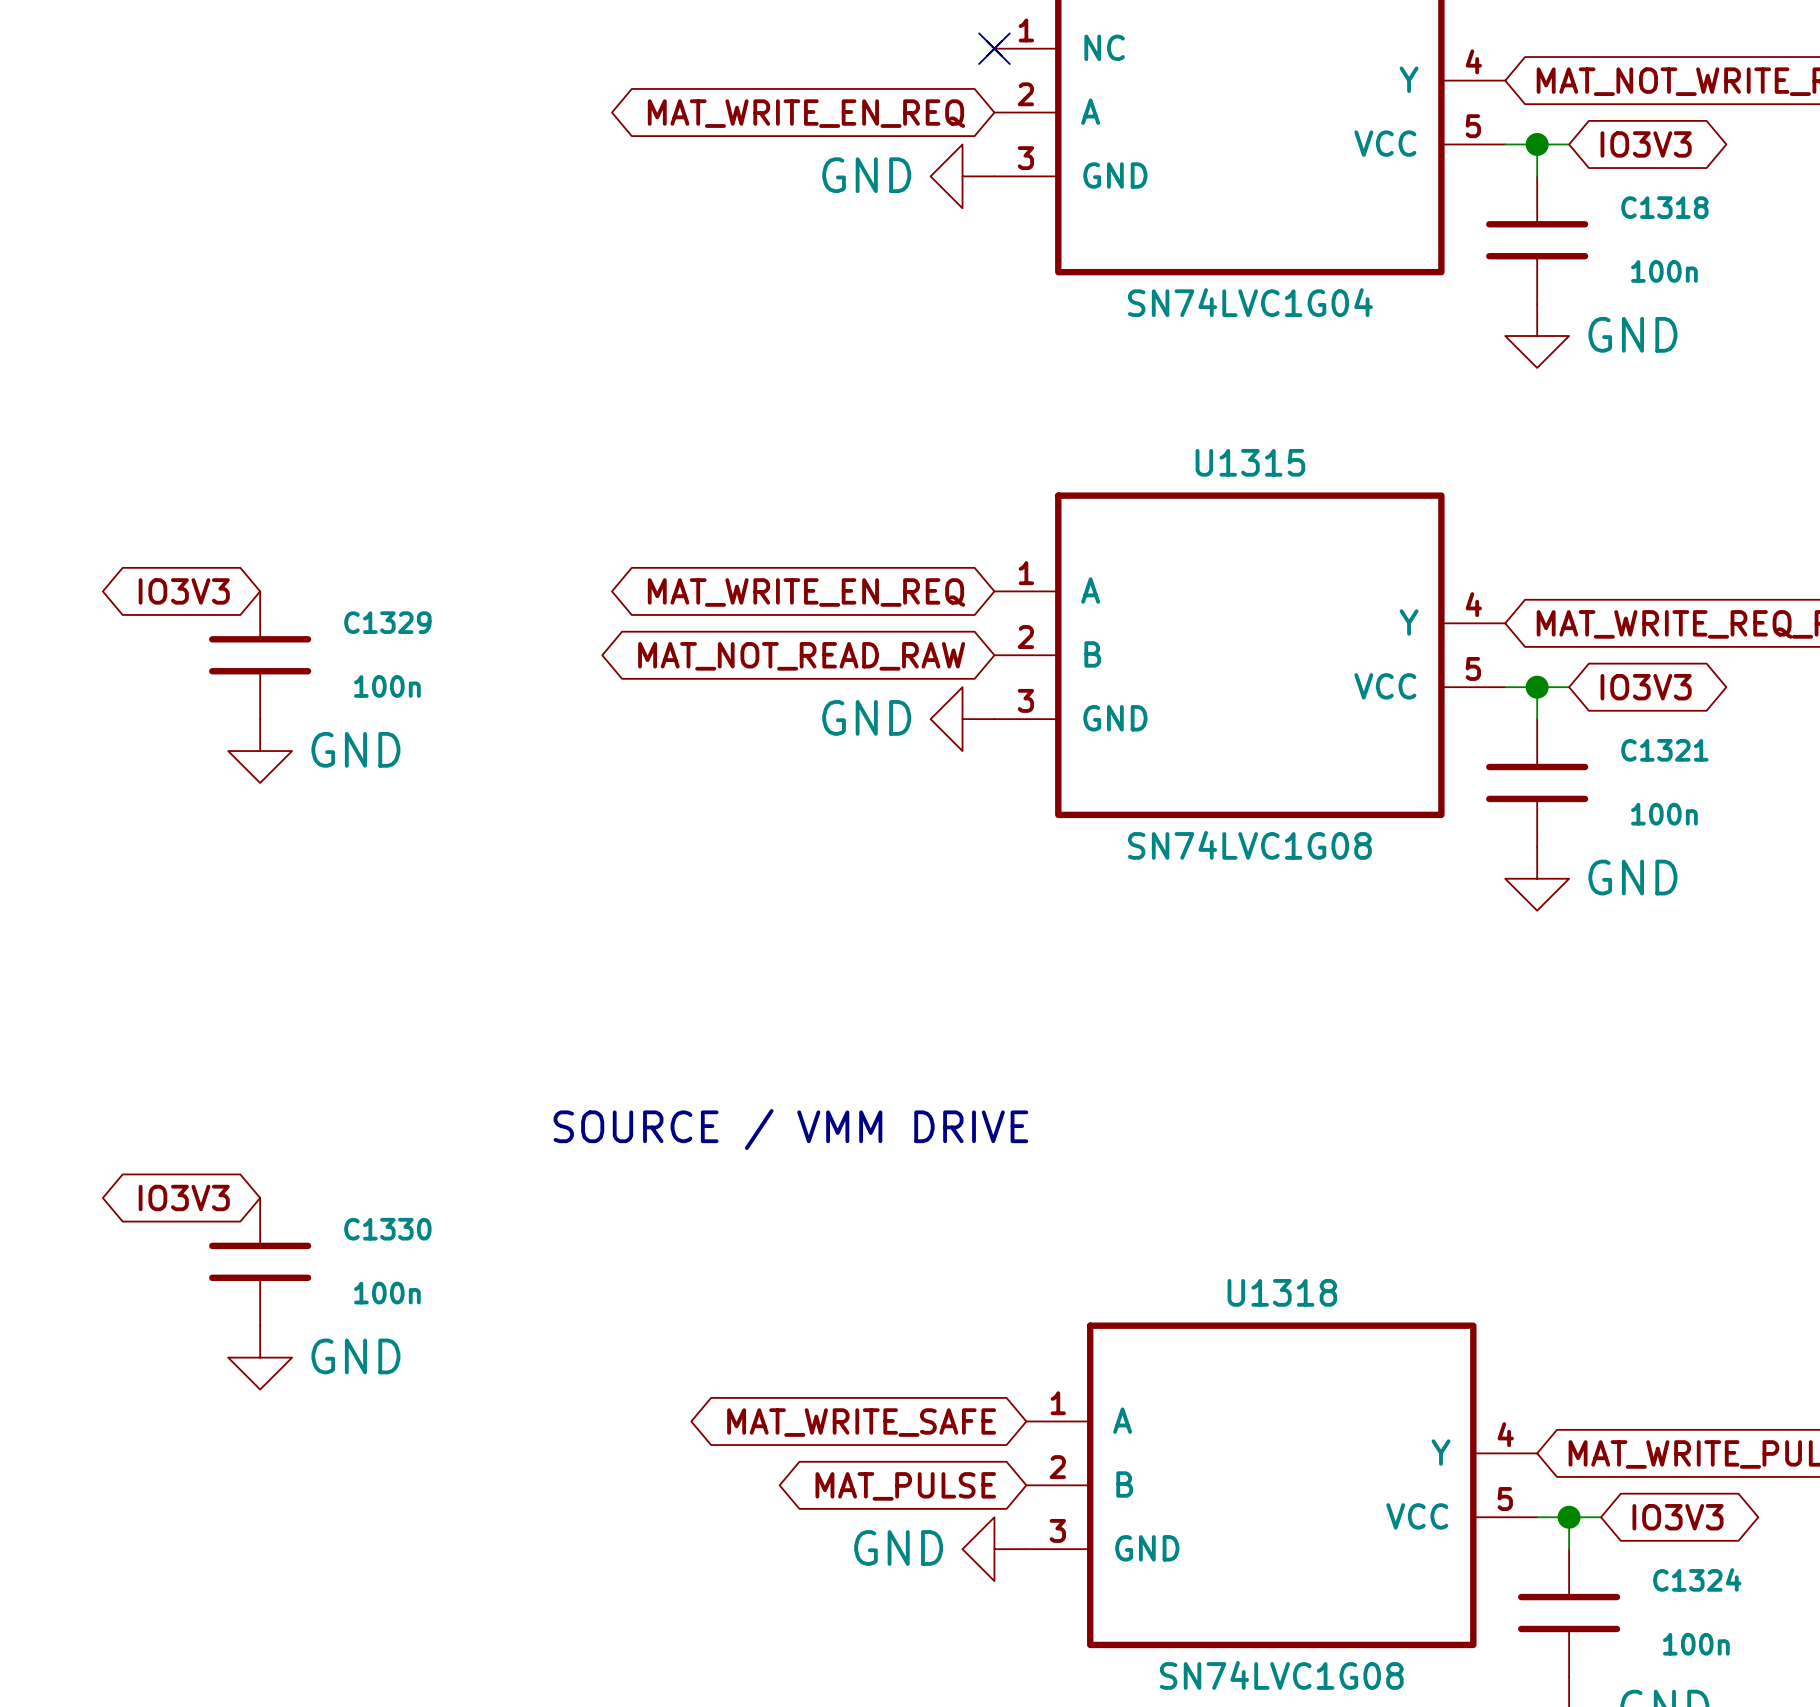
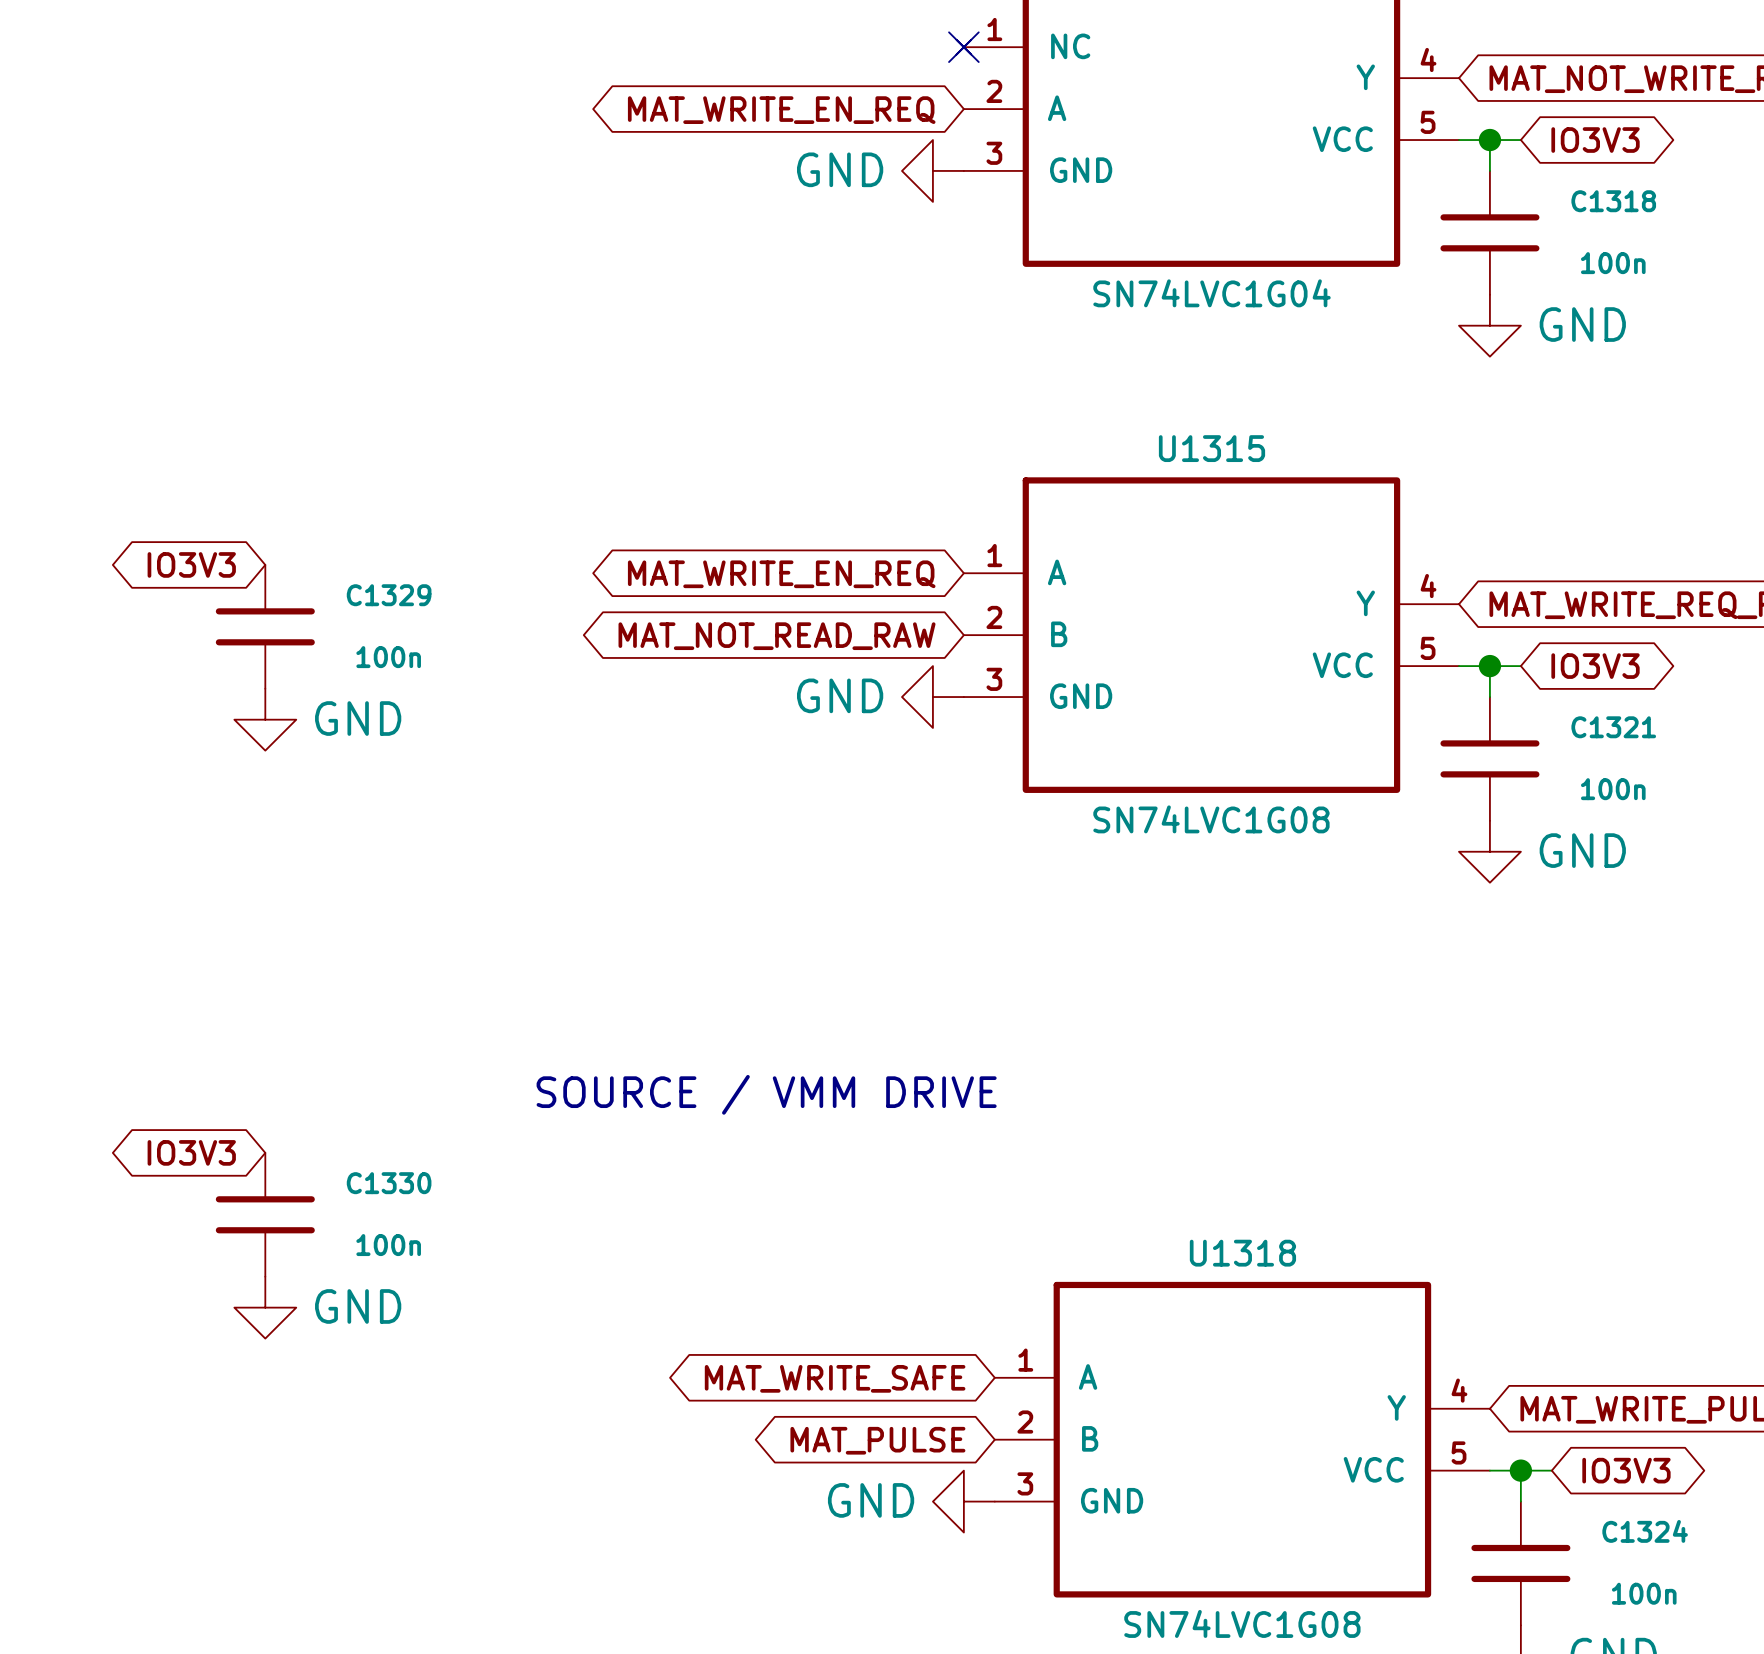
global label position: IO3V3 (184, 591) -> IO3V3 (191, 564)
C1329 position: (260, 655) -> (265, 626)
power symbol position: GND (260, 751) -> GND (265, 719)
global label position: IO3V3 (184, 1198) -> IO3V3 (191, 1152)
C1330 position: (260, 1261) -> (265, 1214)
power symbol position: GND (260, 1357) -> GND (265, 1307)

